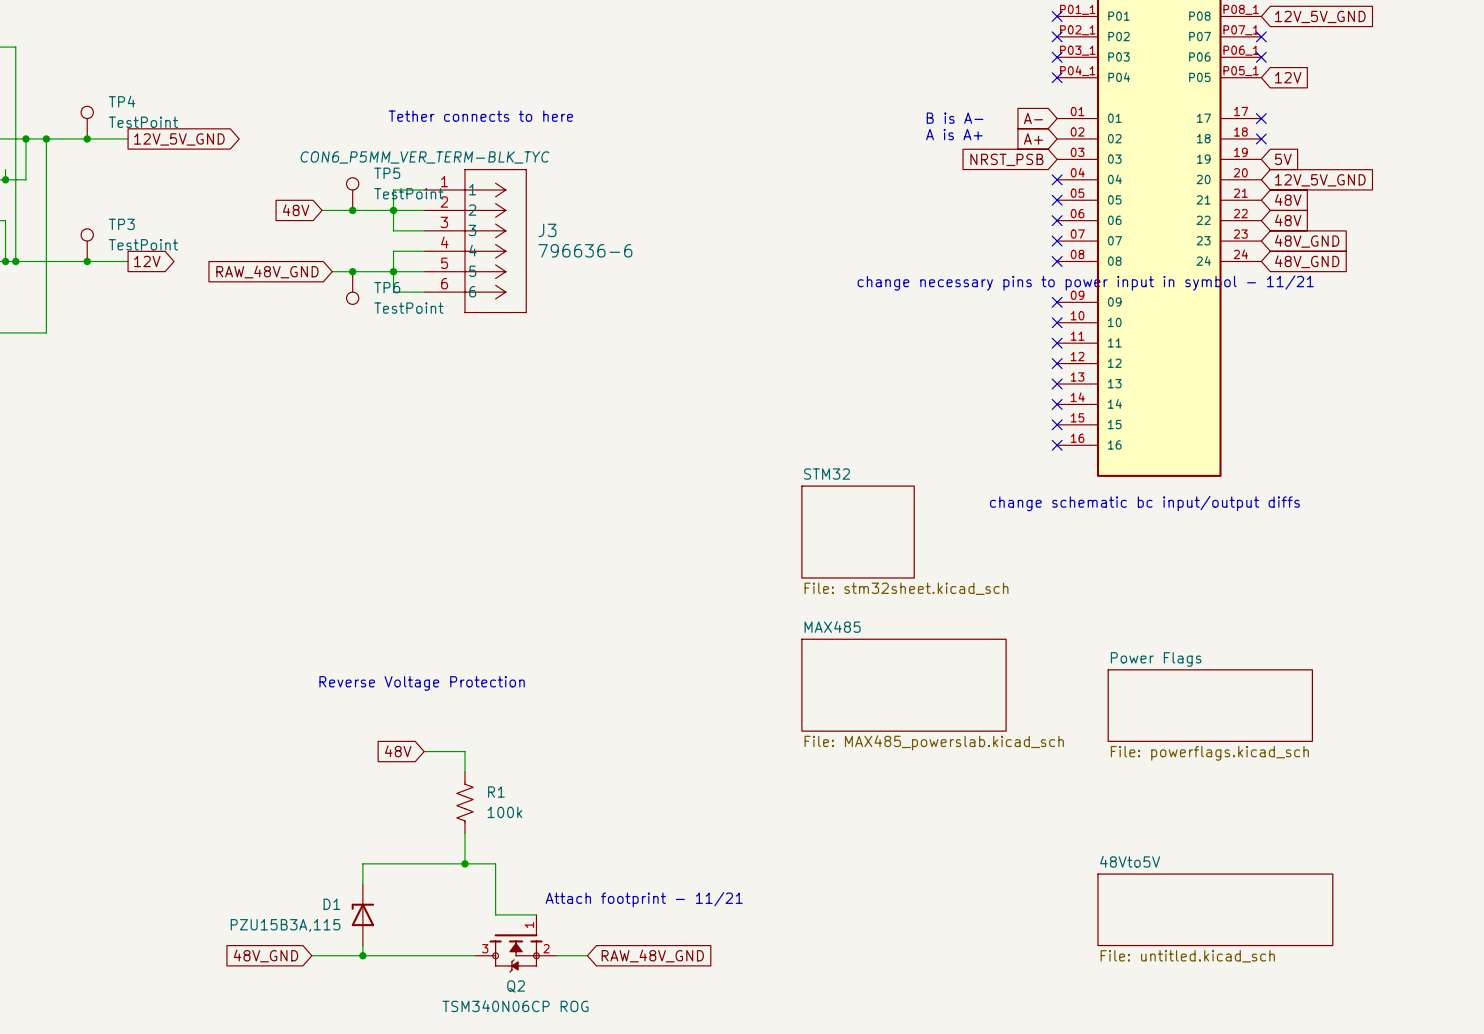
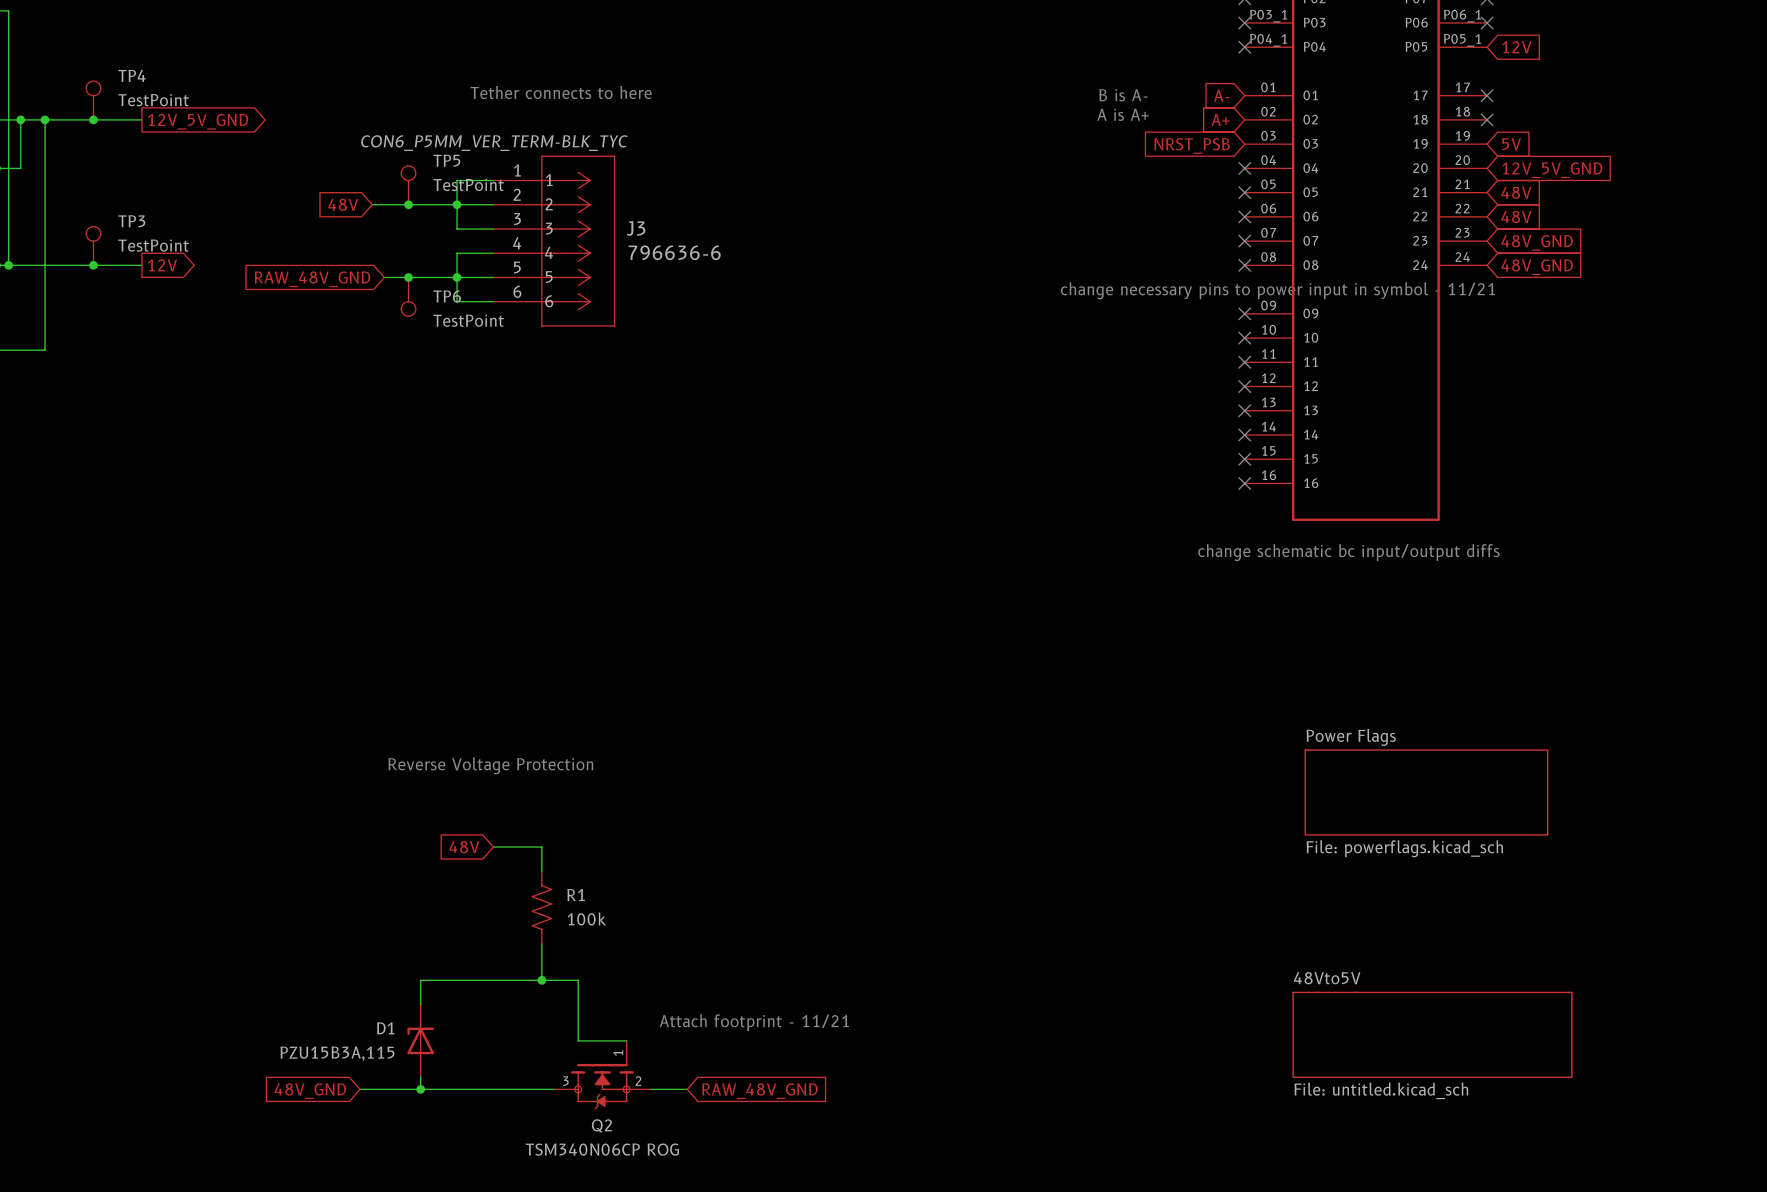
sheet STM32: File: stm32sheet.kicad_sch (858, 532) -> none
sheet MAX485: File: MAX485_powerslab.kicad_sch (904, 685) -> none

